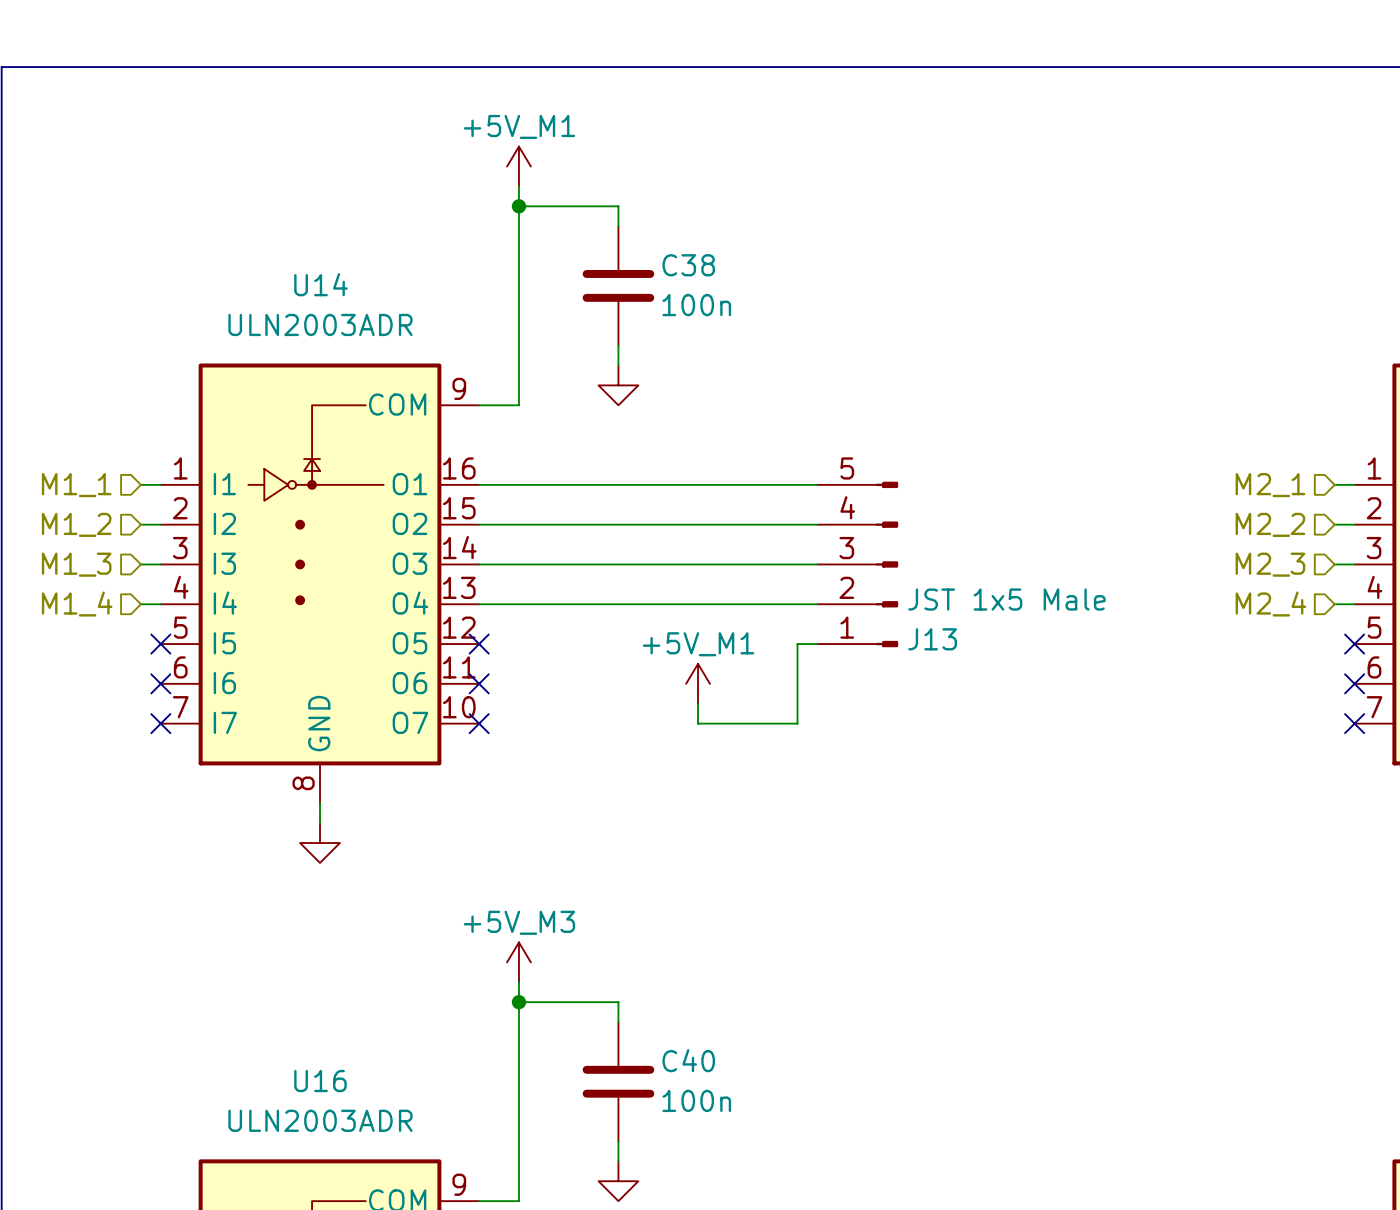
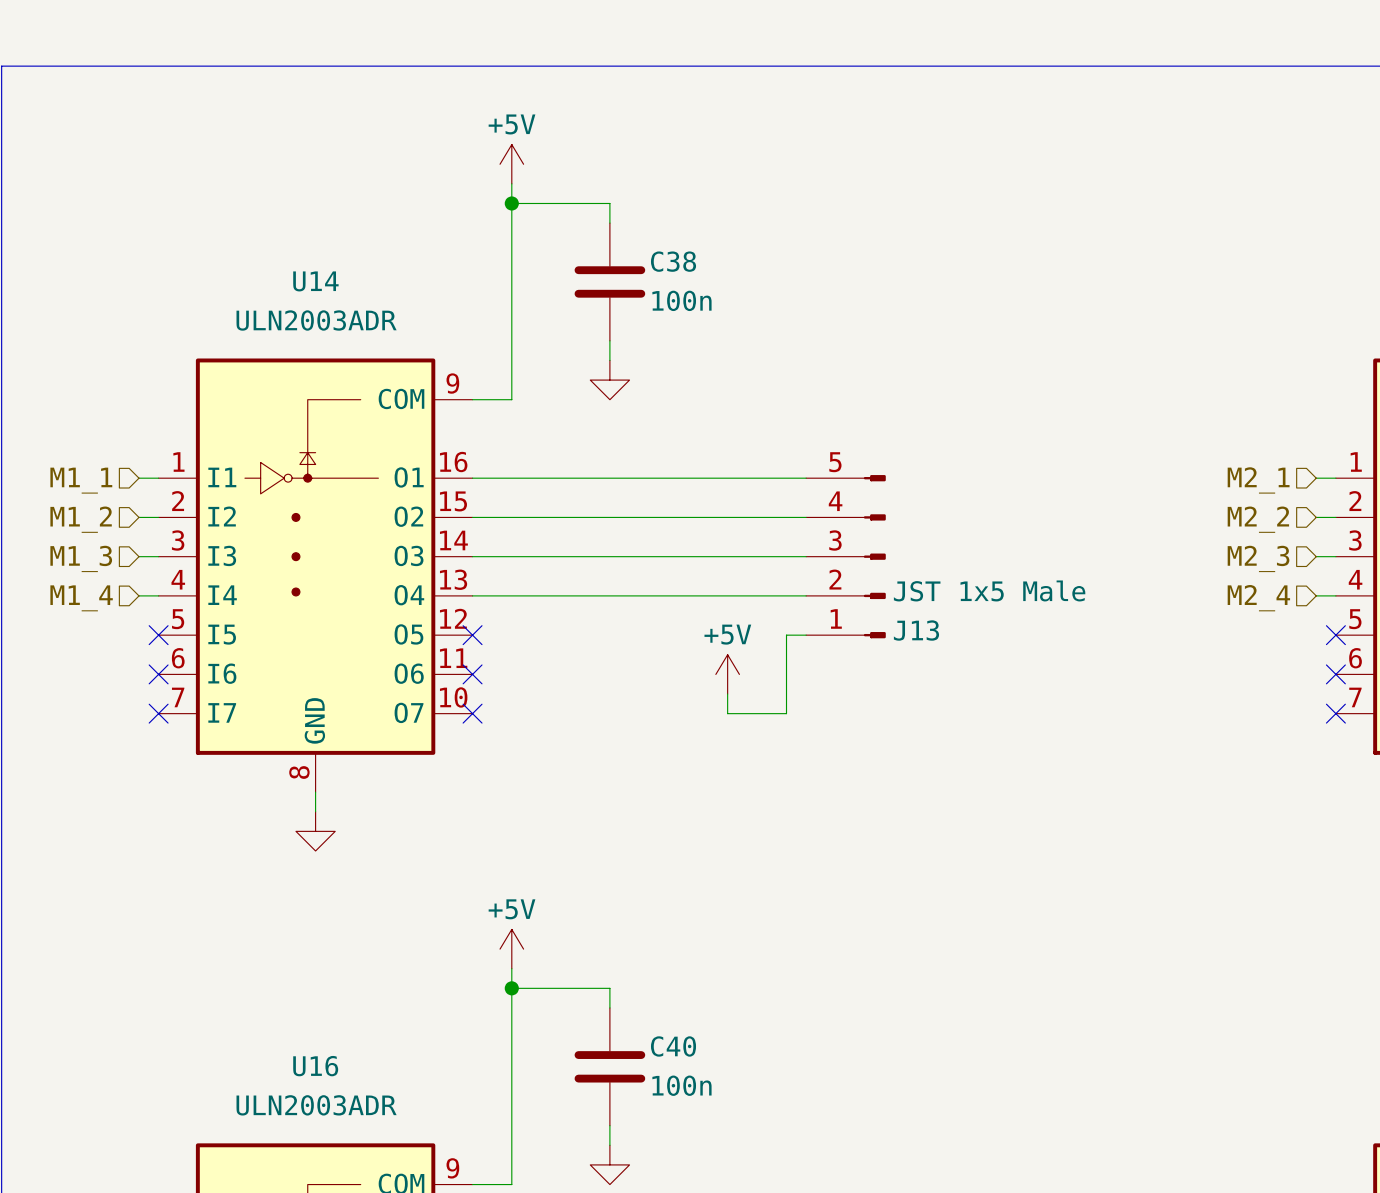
power symbol: +5V_M1 (518, 166) -> +5V (511, 164)
power symbol: +5V_M1 (698, 683) -> none
power symbol: none -> +5V (727, 674)
wire: (698, 703) (698, 723) (737, 723) -> (727, 694) (727, 713)
power symbol: +5V_M3 (518, 962) -> +5V (511, 949)

